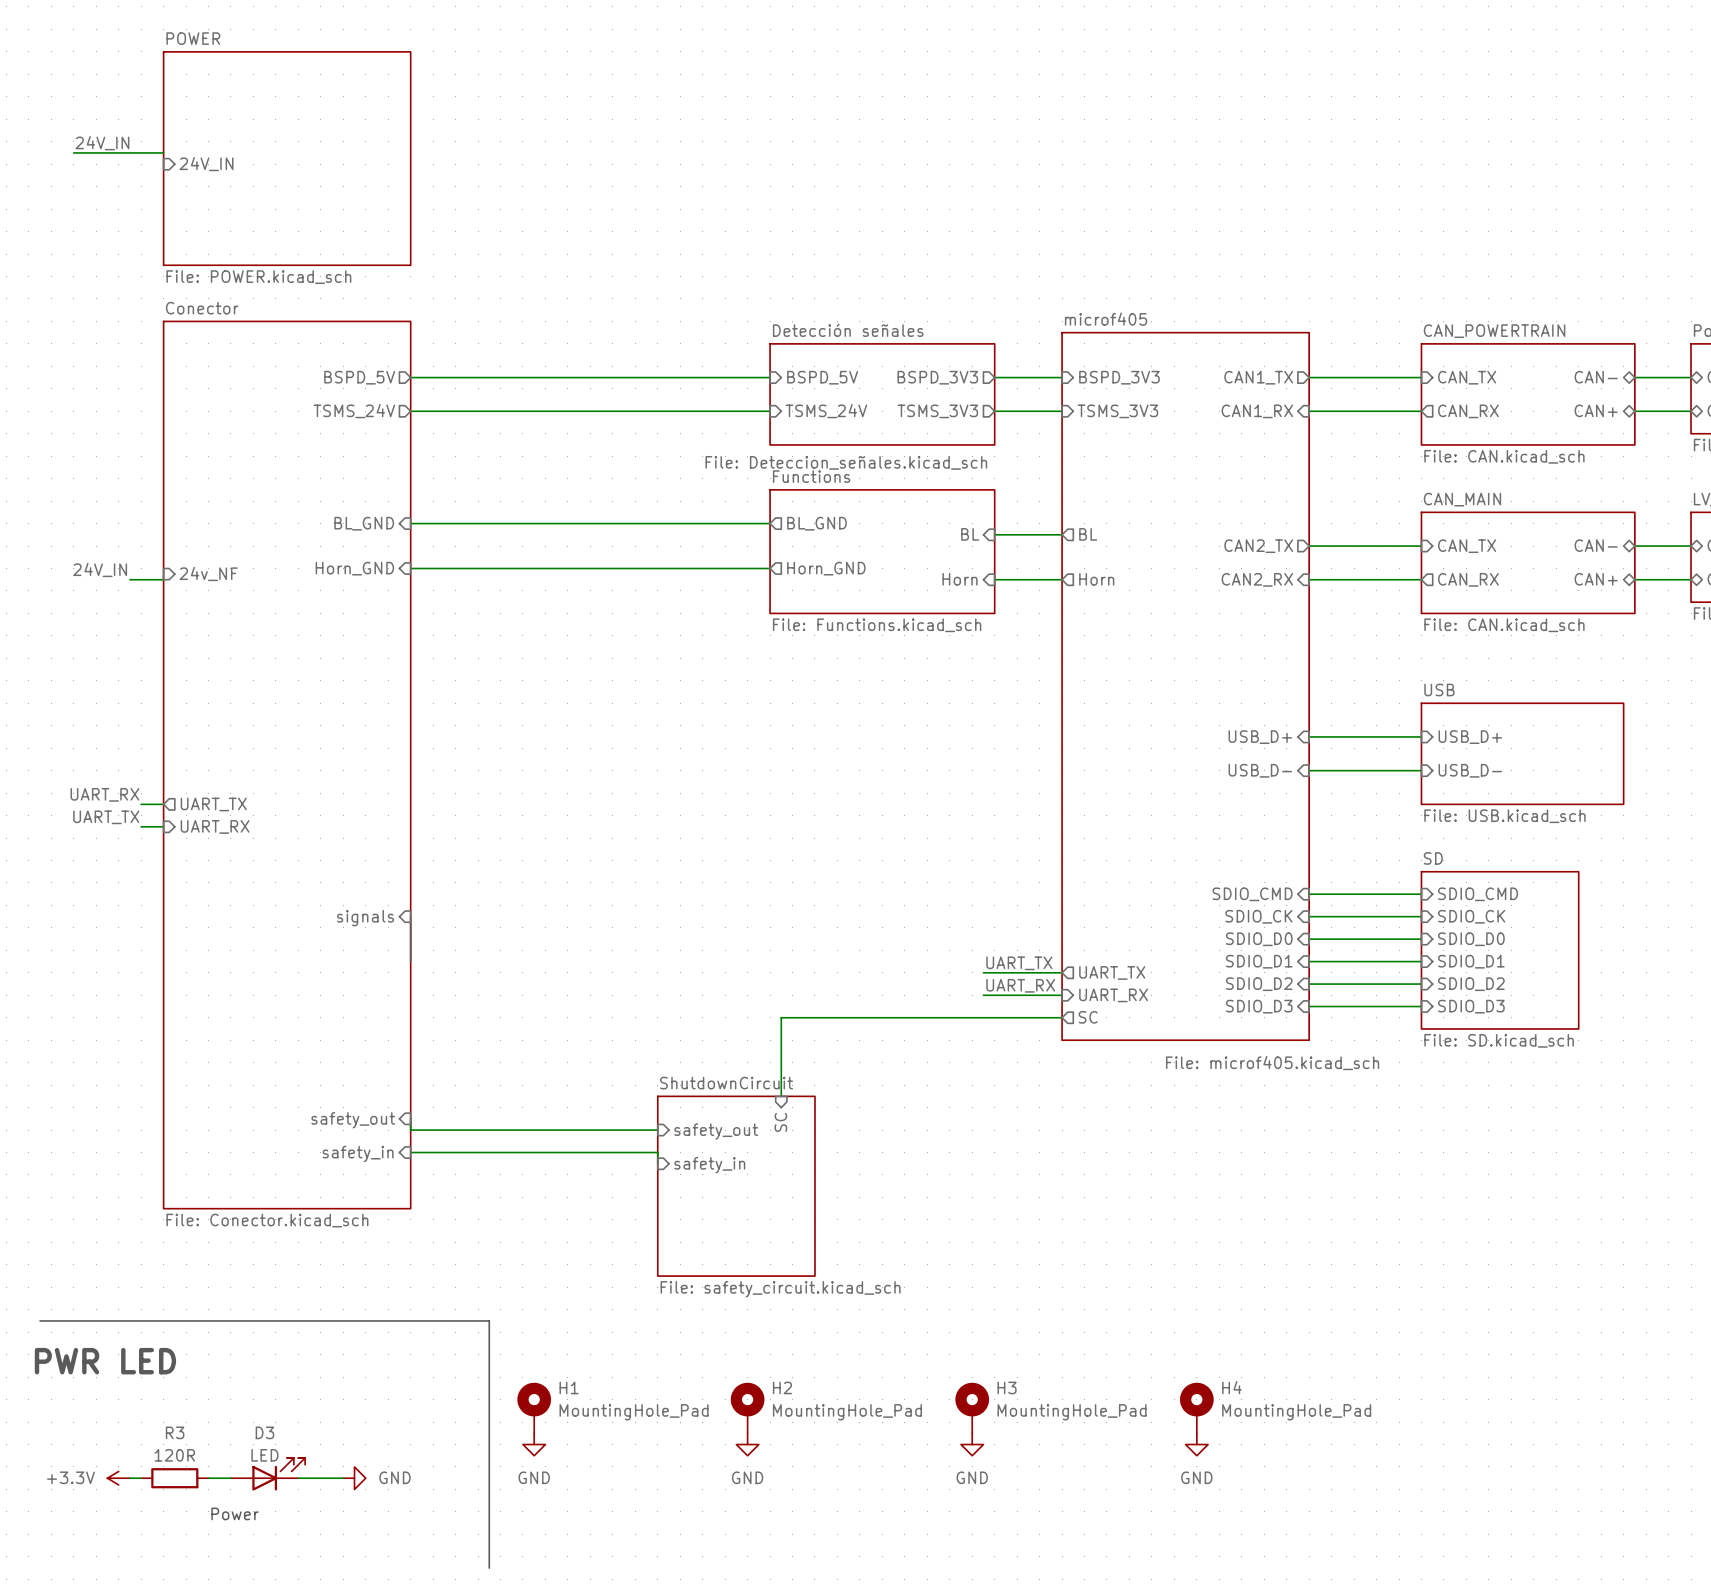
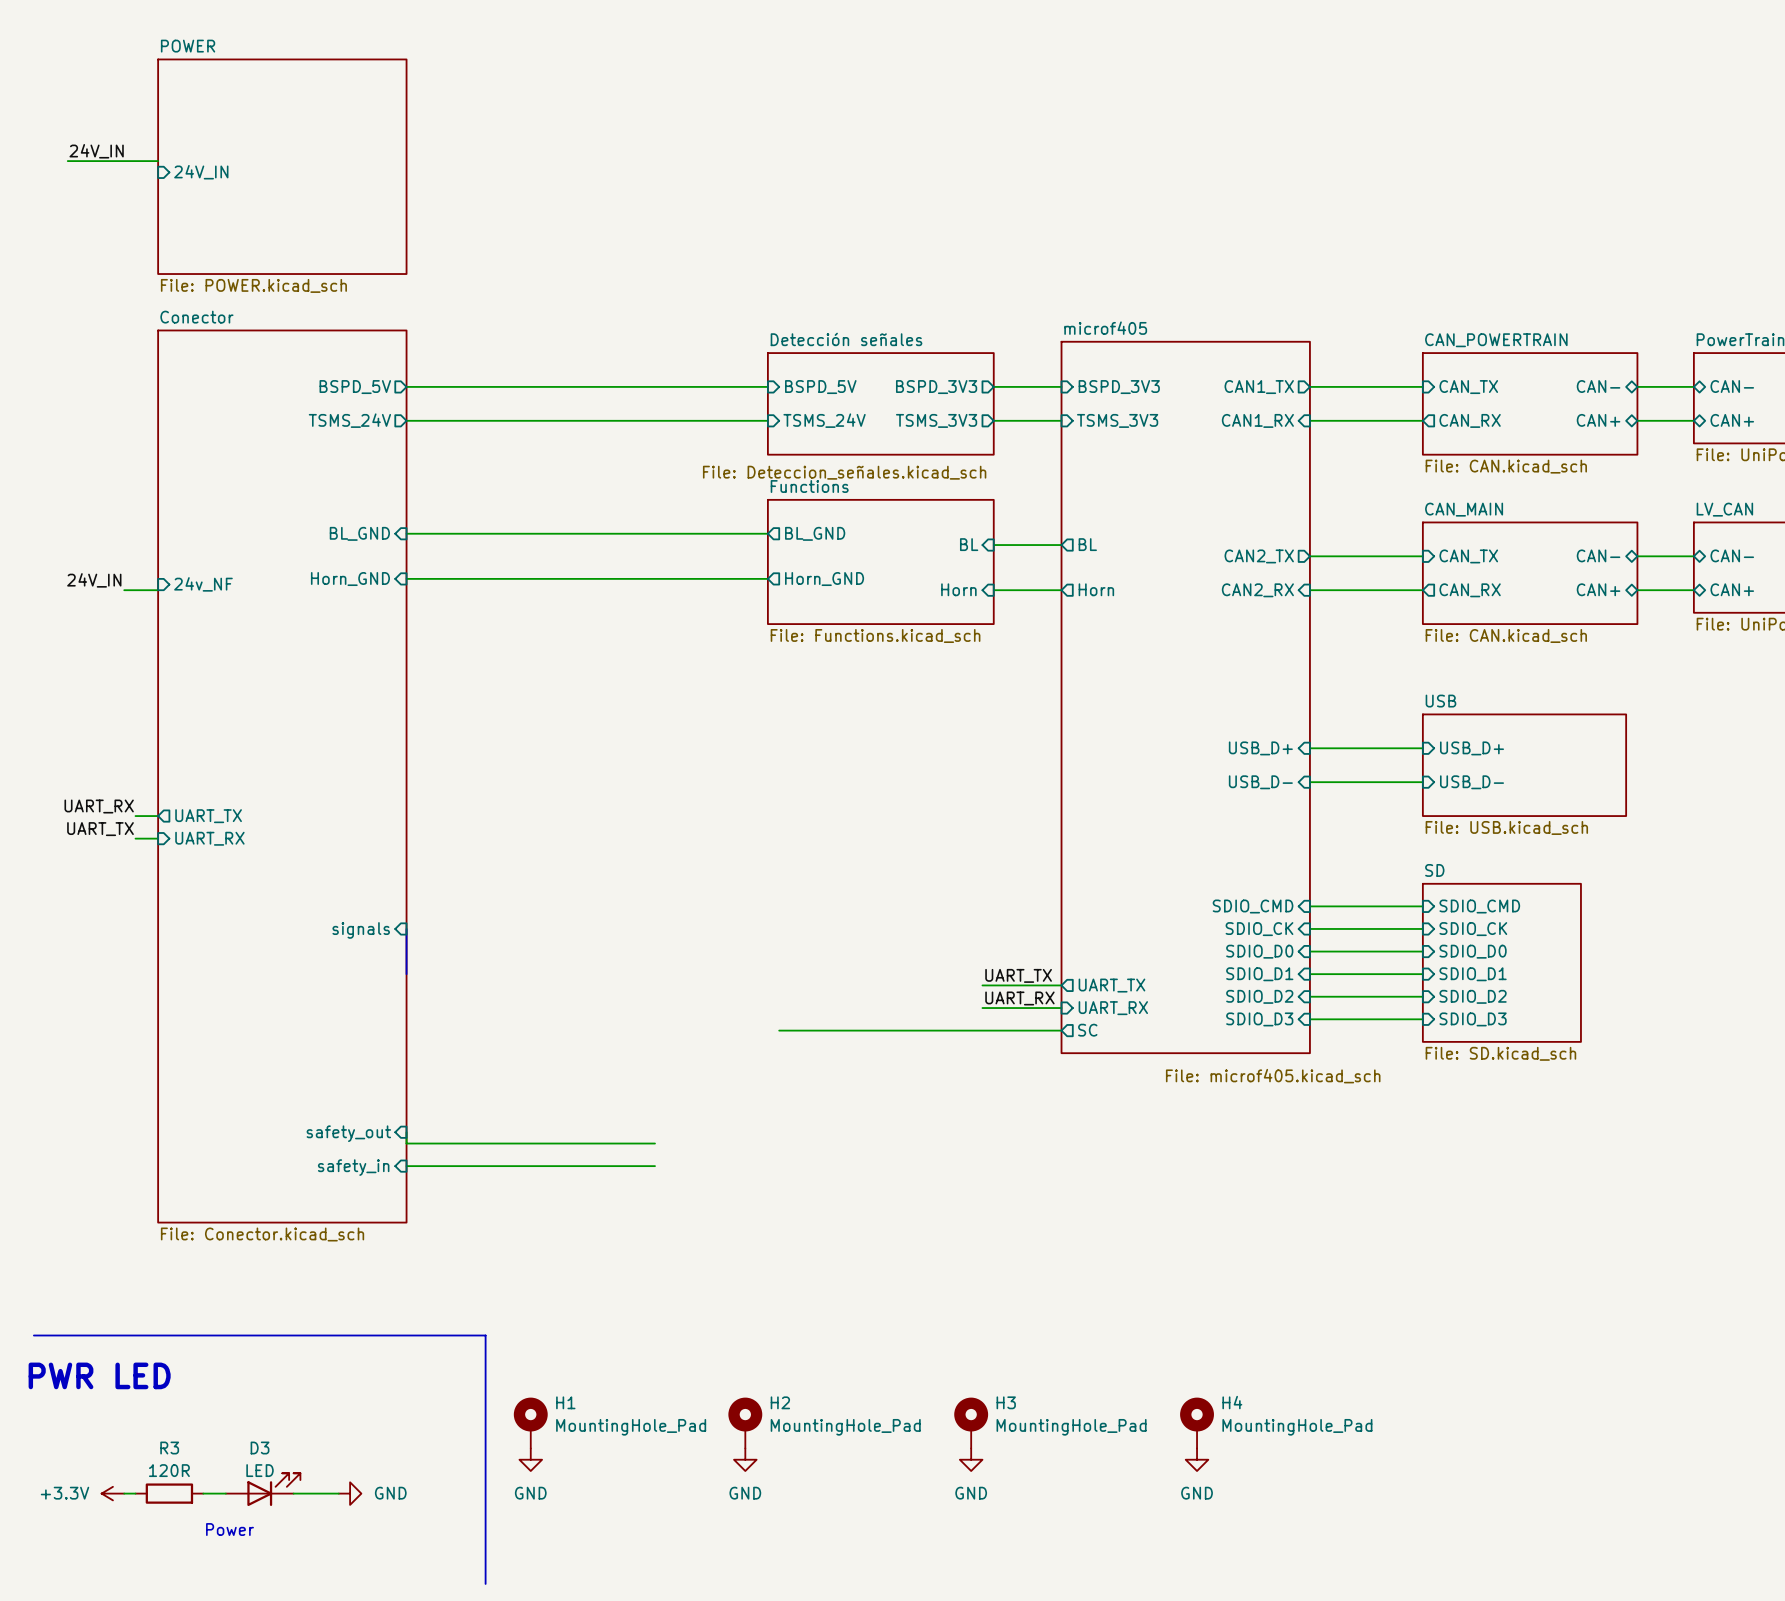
wire: (781, 1017) (781, 1096) -> none
sheet pin: SC (780, 1122) -> none
sheet pin: safety_out (716, 1131) -> none
wire: (657, 1152) (657, 1163) -> none
sheet pin: safety_in (709, 1165) -> none
sheet ShutdownCircuit: File: safety_circuit.kicad_sch (736, 1186) -> none

